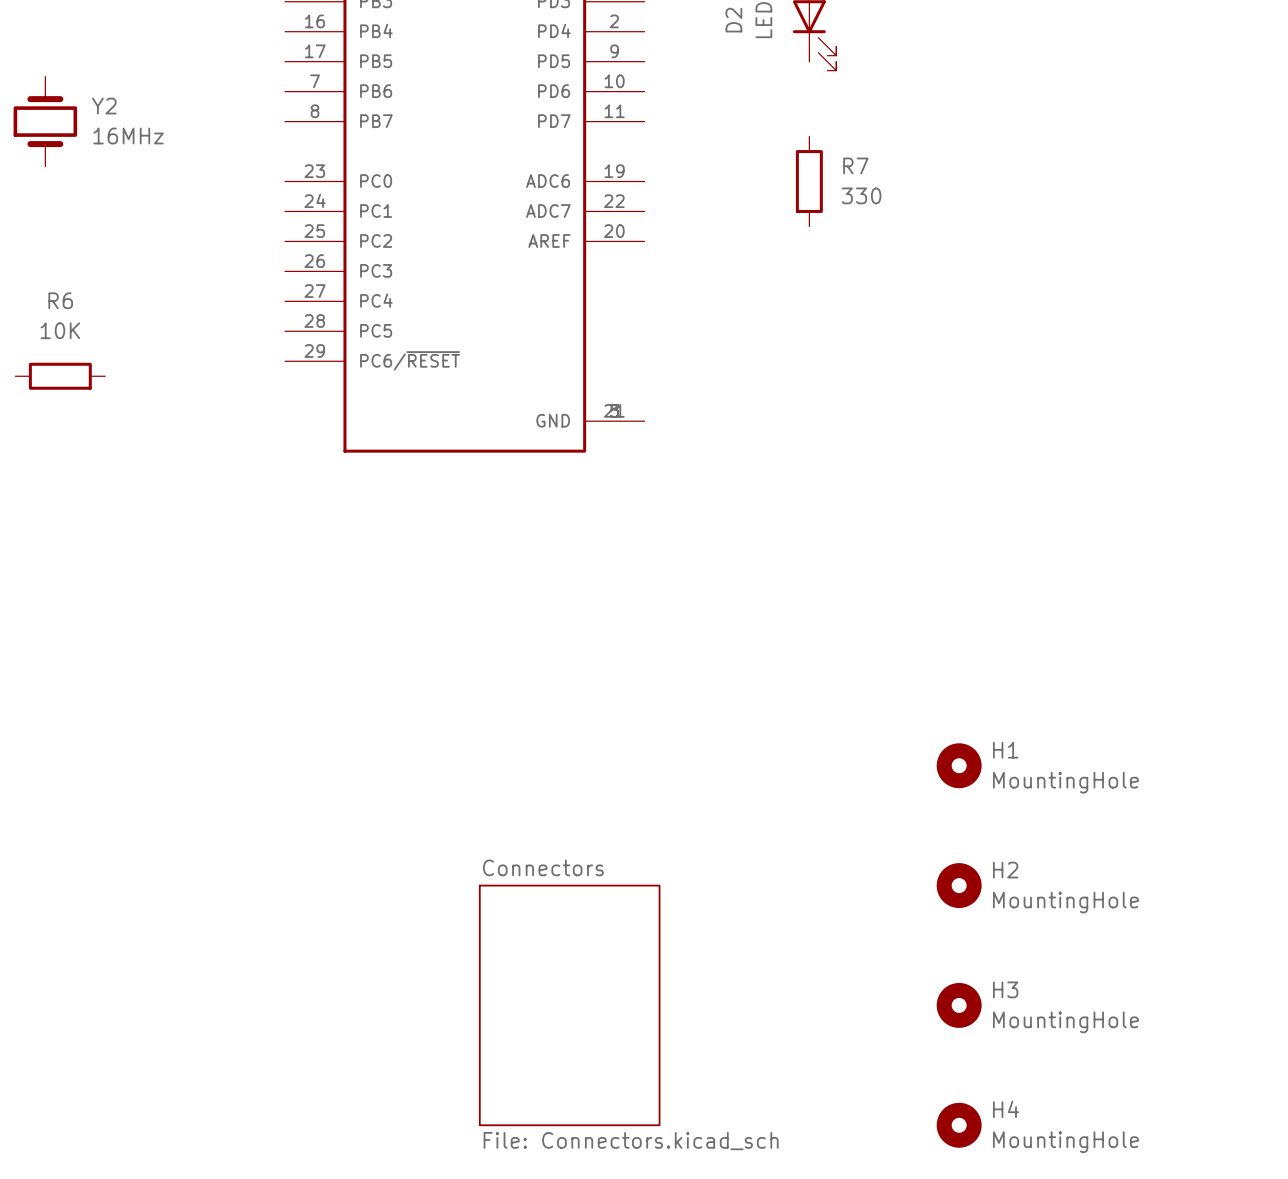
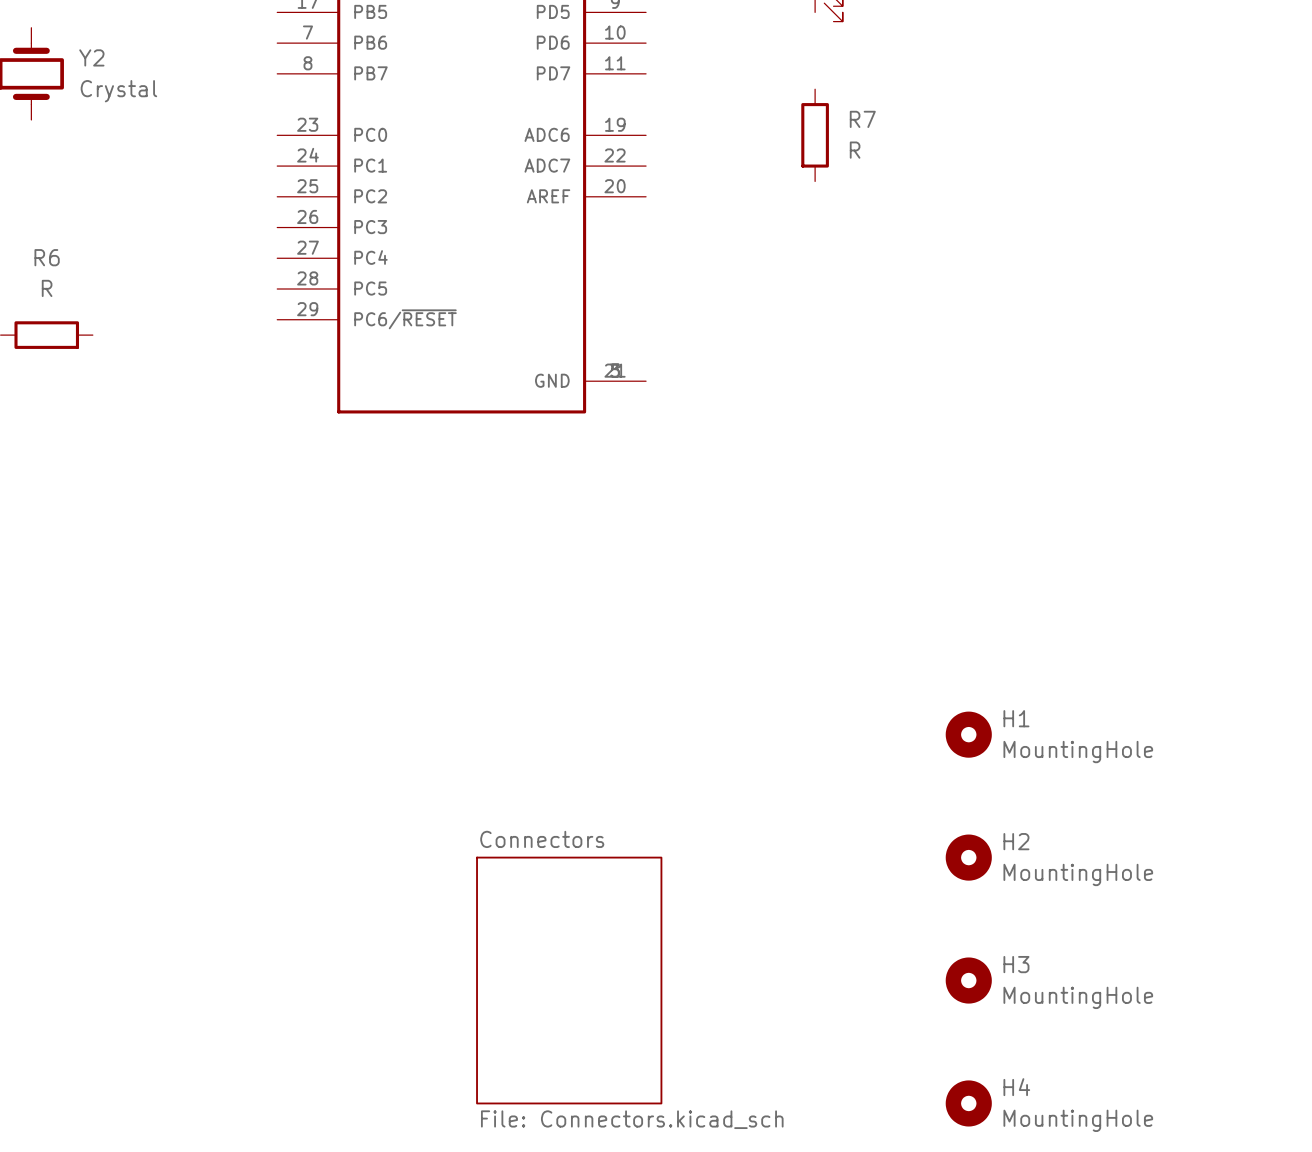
Y2 value: 16MHz (128, 136) -> Crystal (118, 91)
R7 value: 330 (861, 195) -> R (855, 150)
R6 value: 10K (60, 330) -> R (47, 288)

